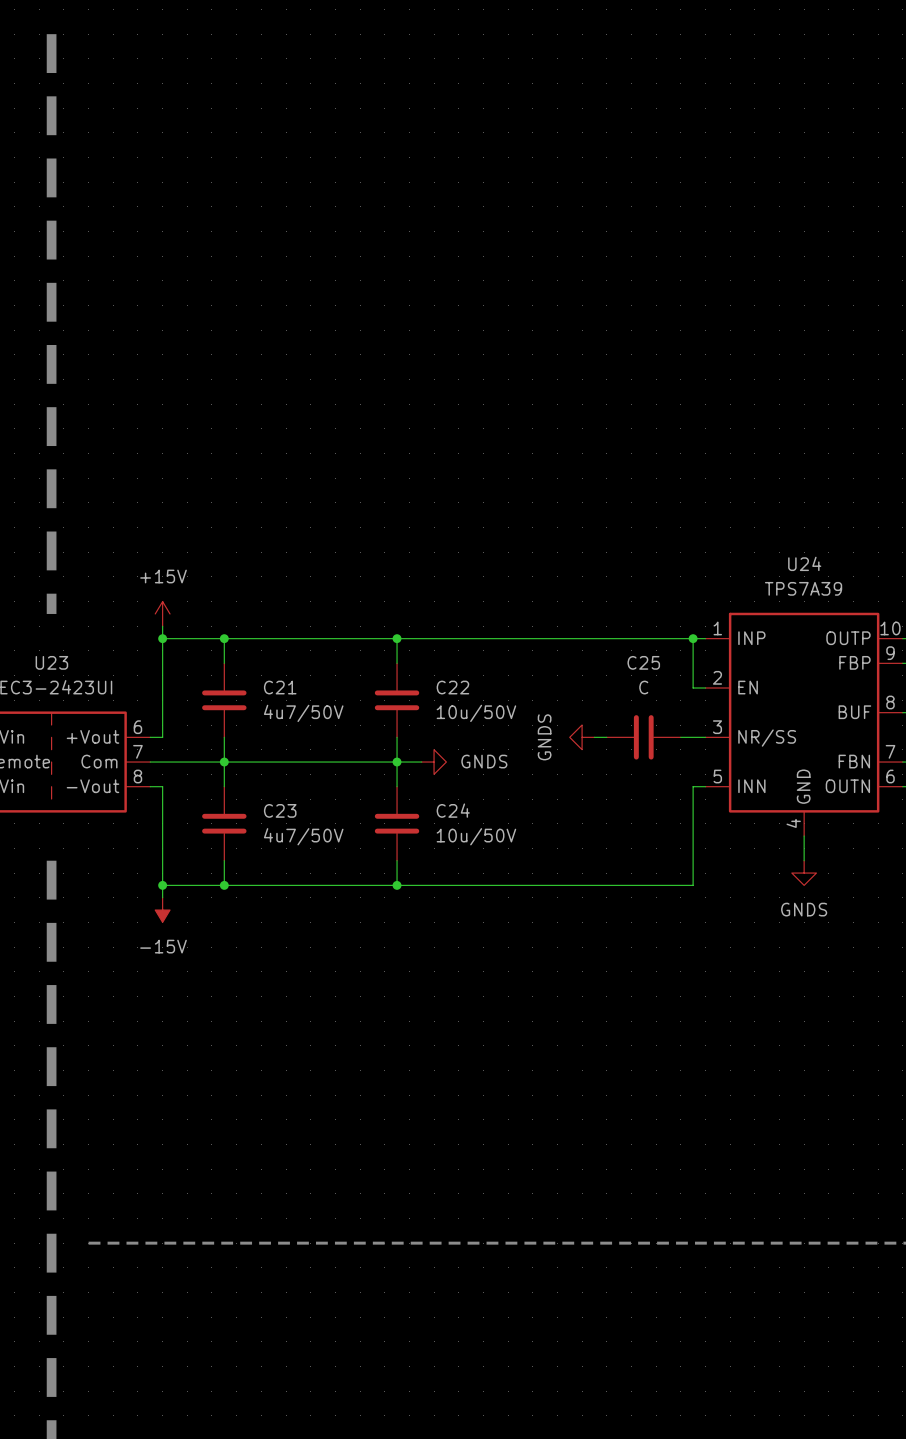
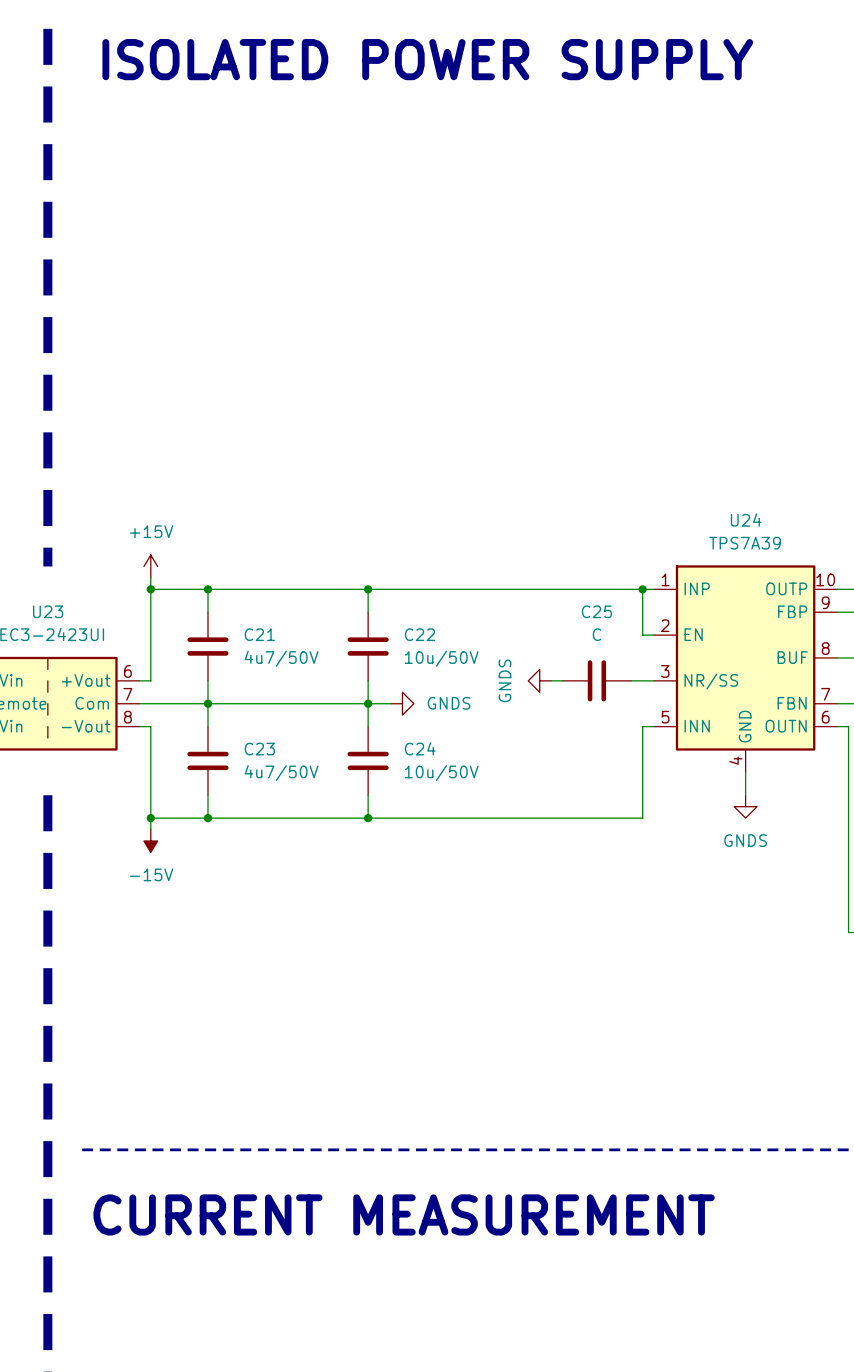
text: none -> ISOLATED POWER SUPPLY (427, 59)
text: none -> CURRENT MEASUREMENT (404, 1214)

